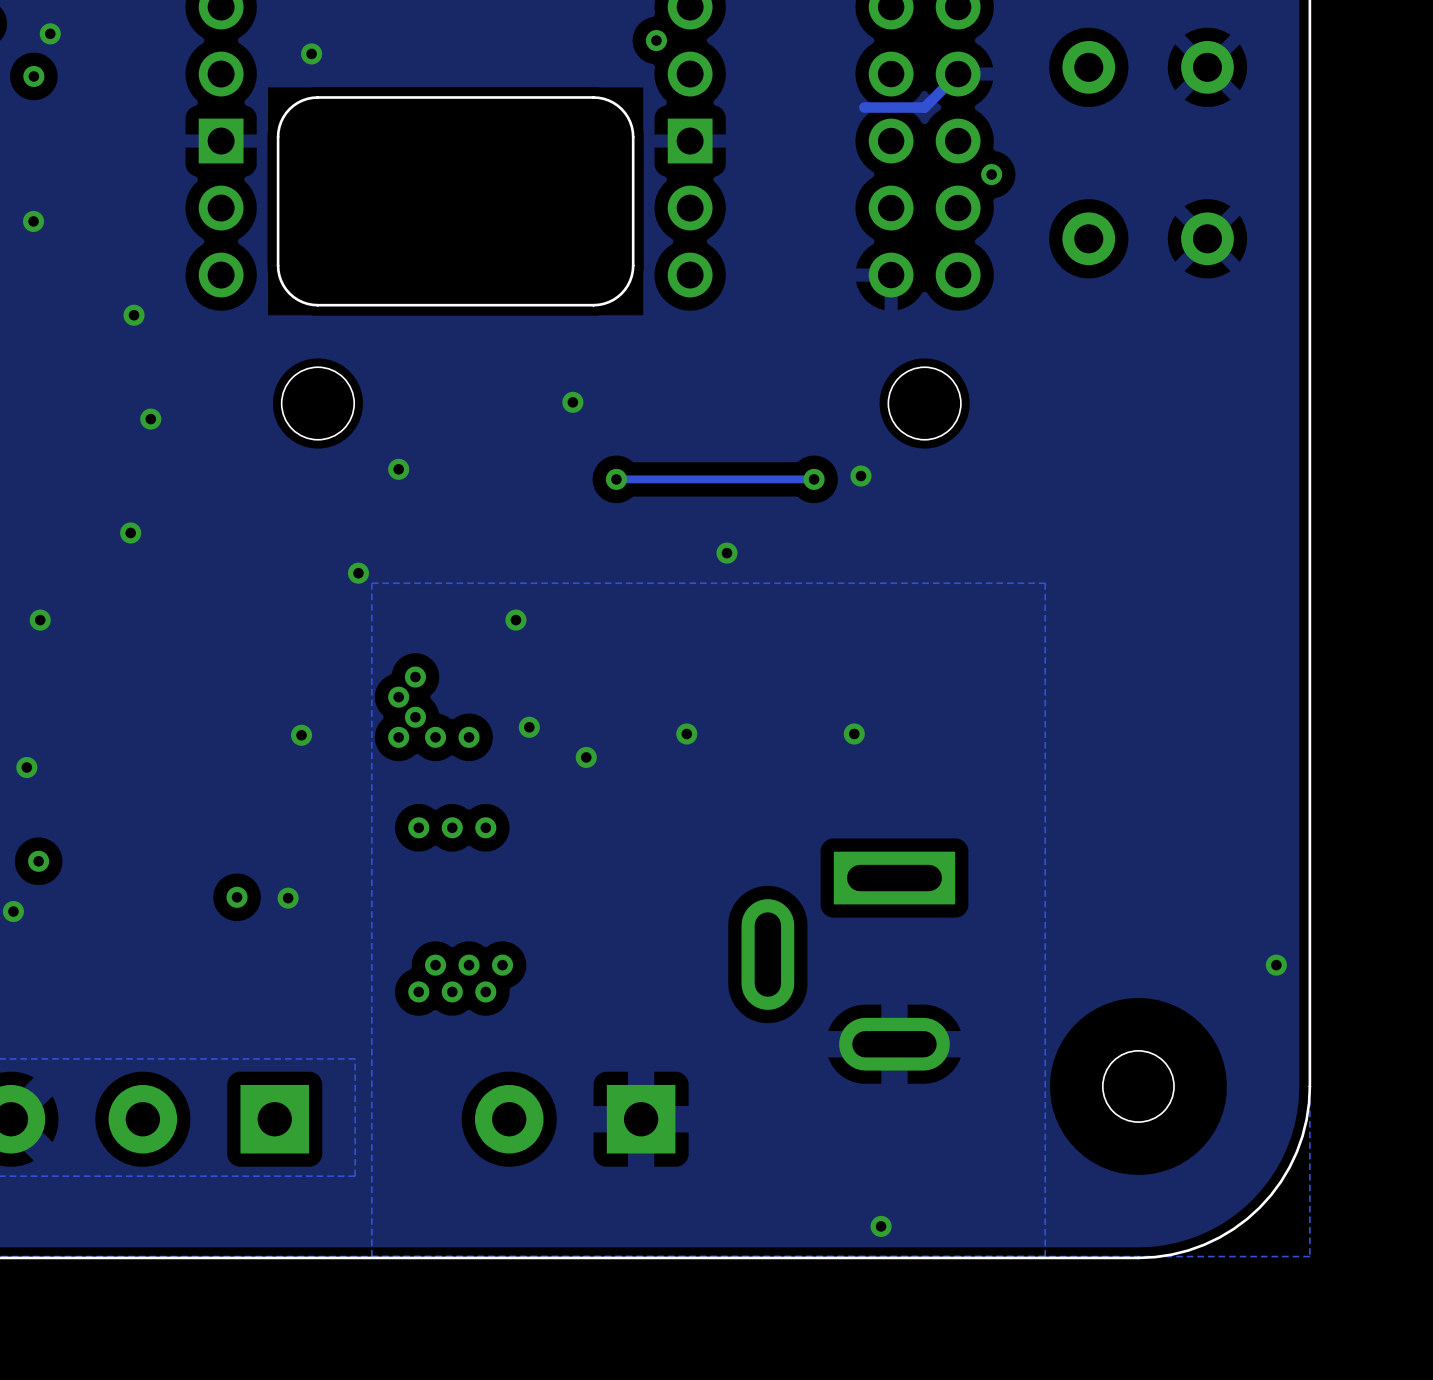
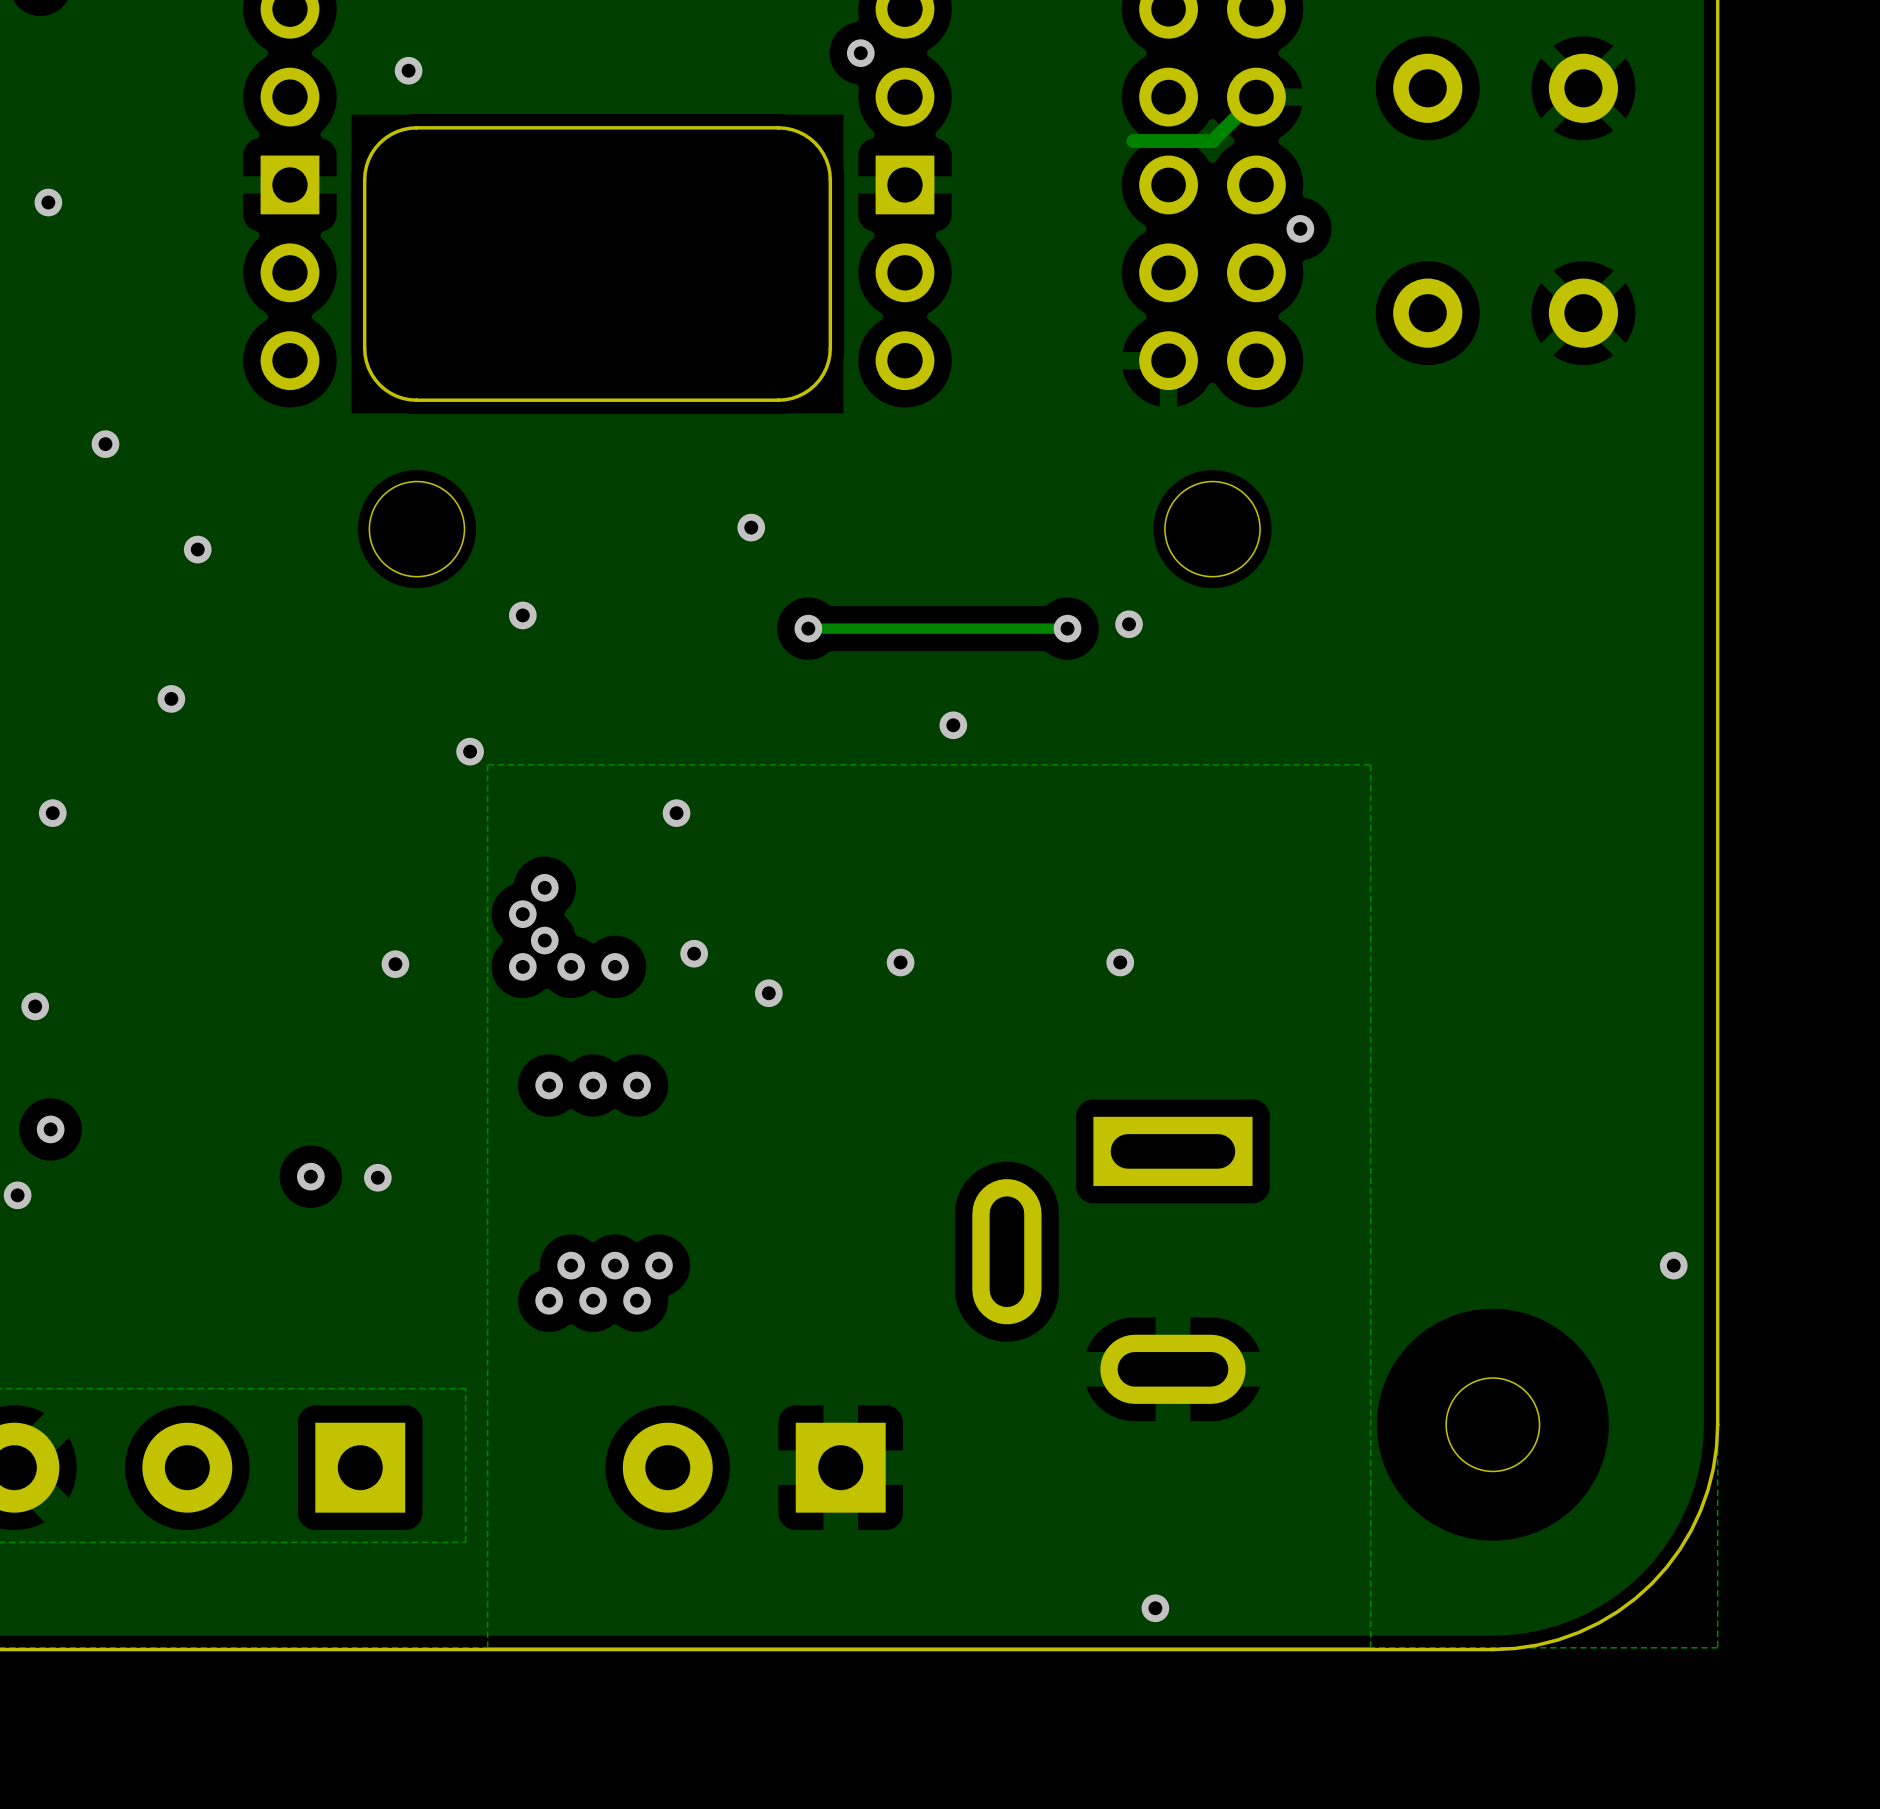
via: (50, 33) -> none
via: (33, 76) -> none
via: none -> (48, 202)
via: (33, 221) -> none
via position: (134, 315) -> (105, 444)

